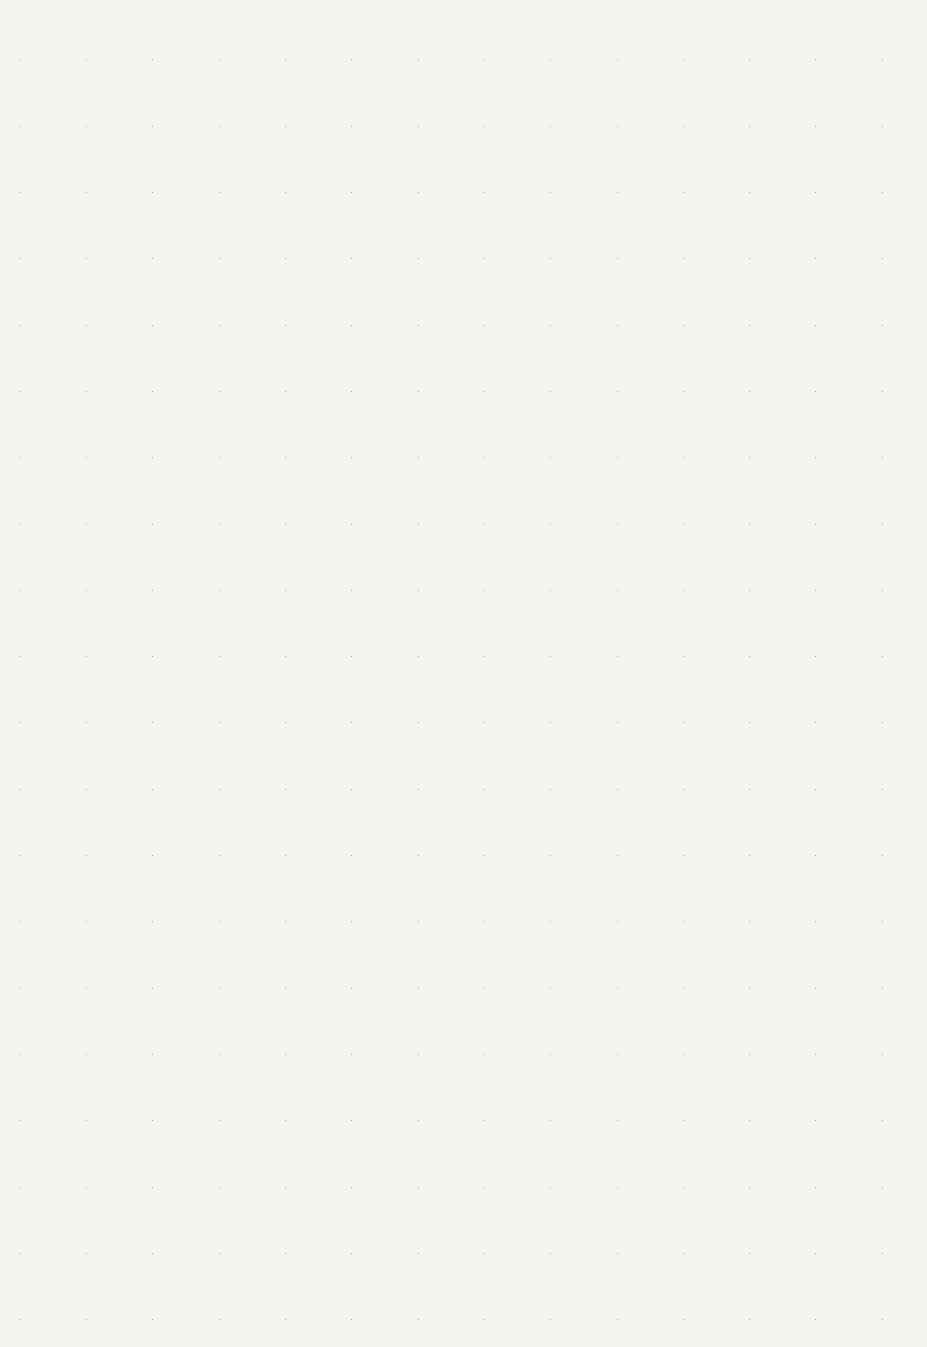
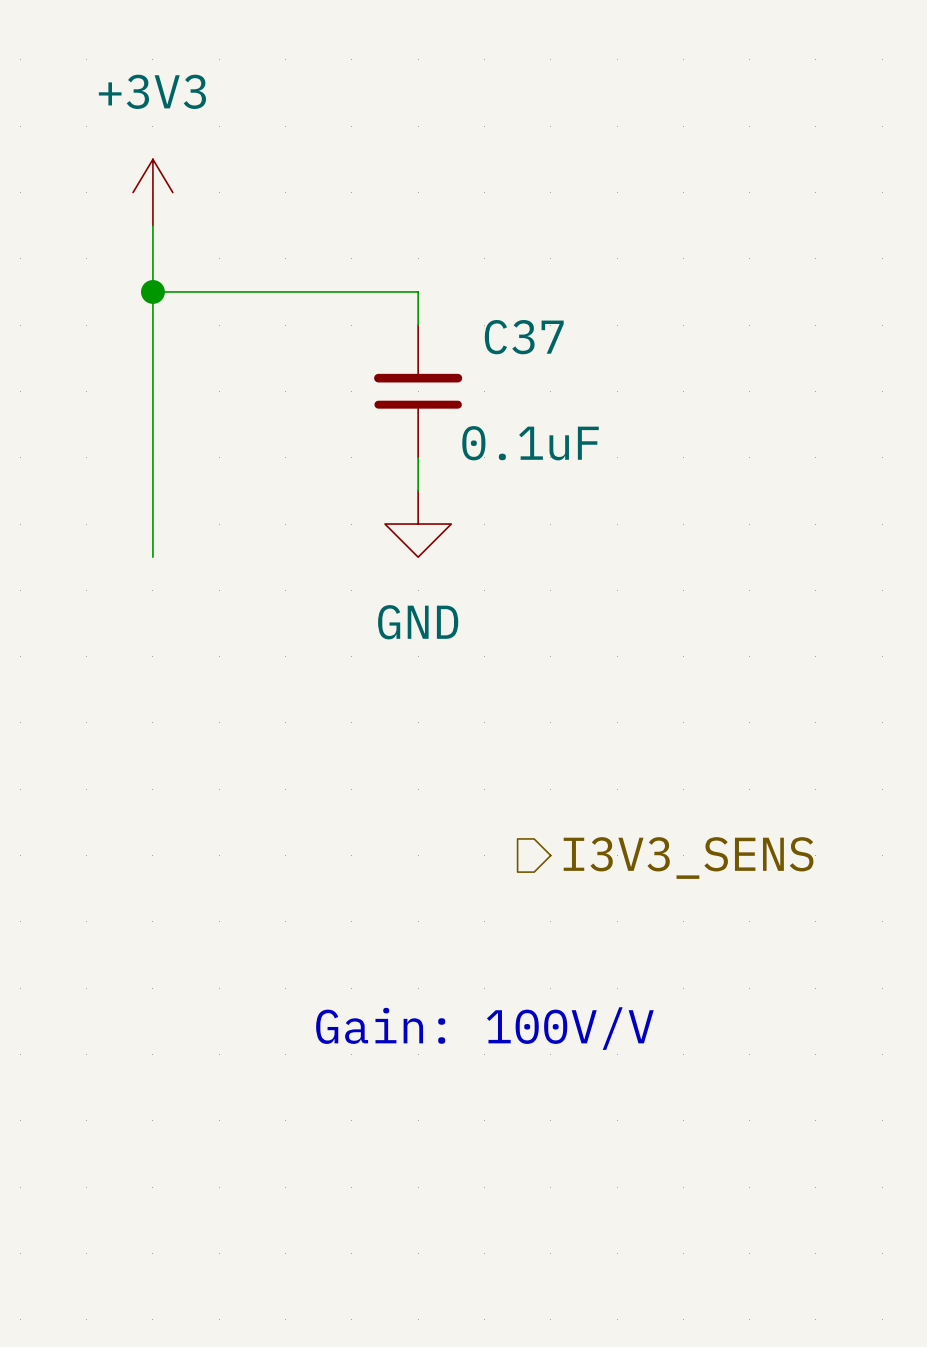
power symbol: none -> +3V3 (152, 192)
wire: none -> (152, 225) (152, 557)
wire: none -> (152, 291) (418, 291) (418, 325)
junction: none -> (152, 291)
C37: none -> 0.1uF (418, 391)
wire: none -> (418, 457) (418, 490)
power symbol: none -> GND (418, 524)
hierarchical label: none -> I3V3_SENS (688, 858)
text: none -> Gain: 100V/V (484, 1028)

